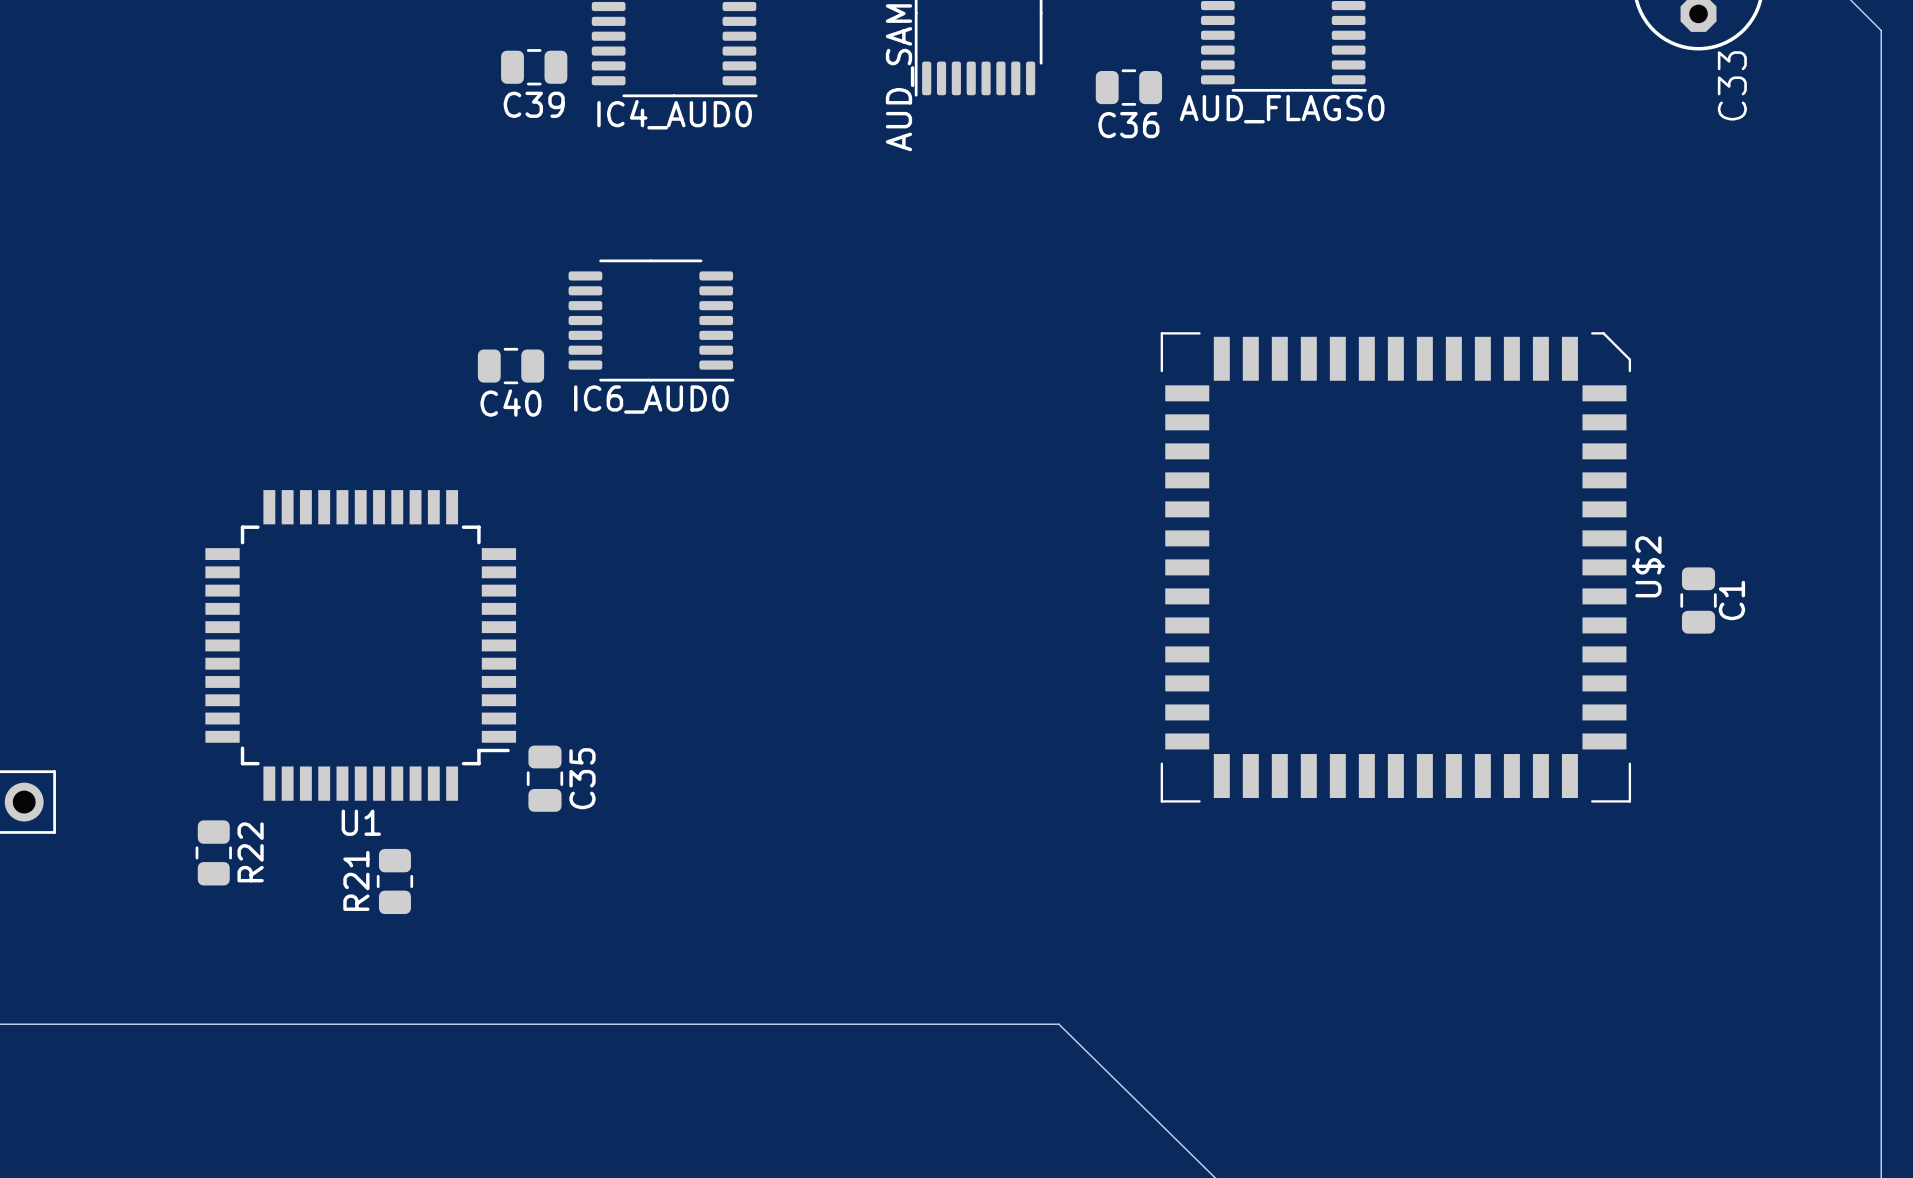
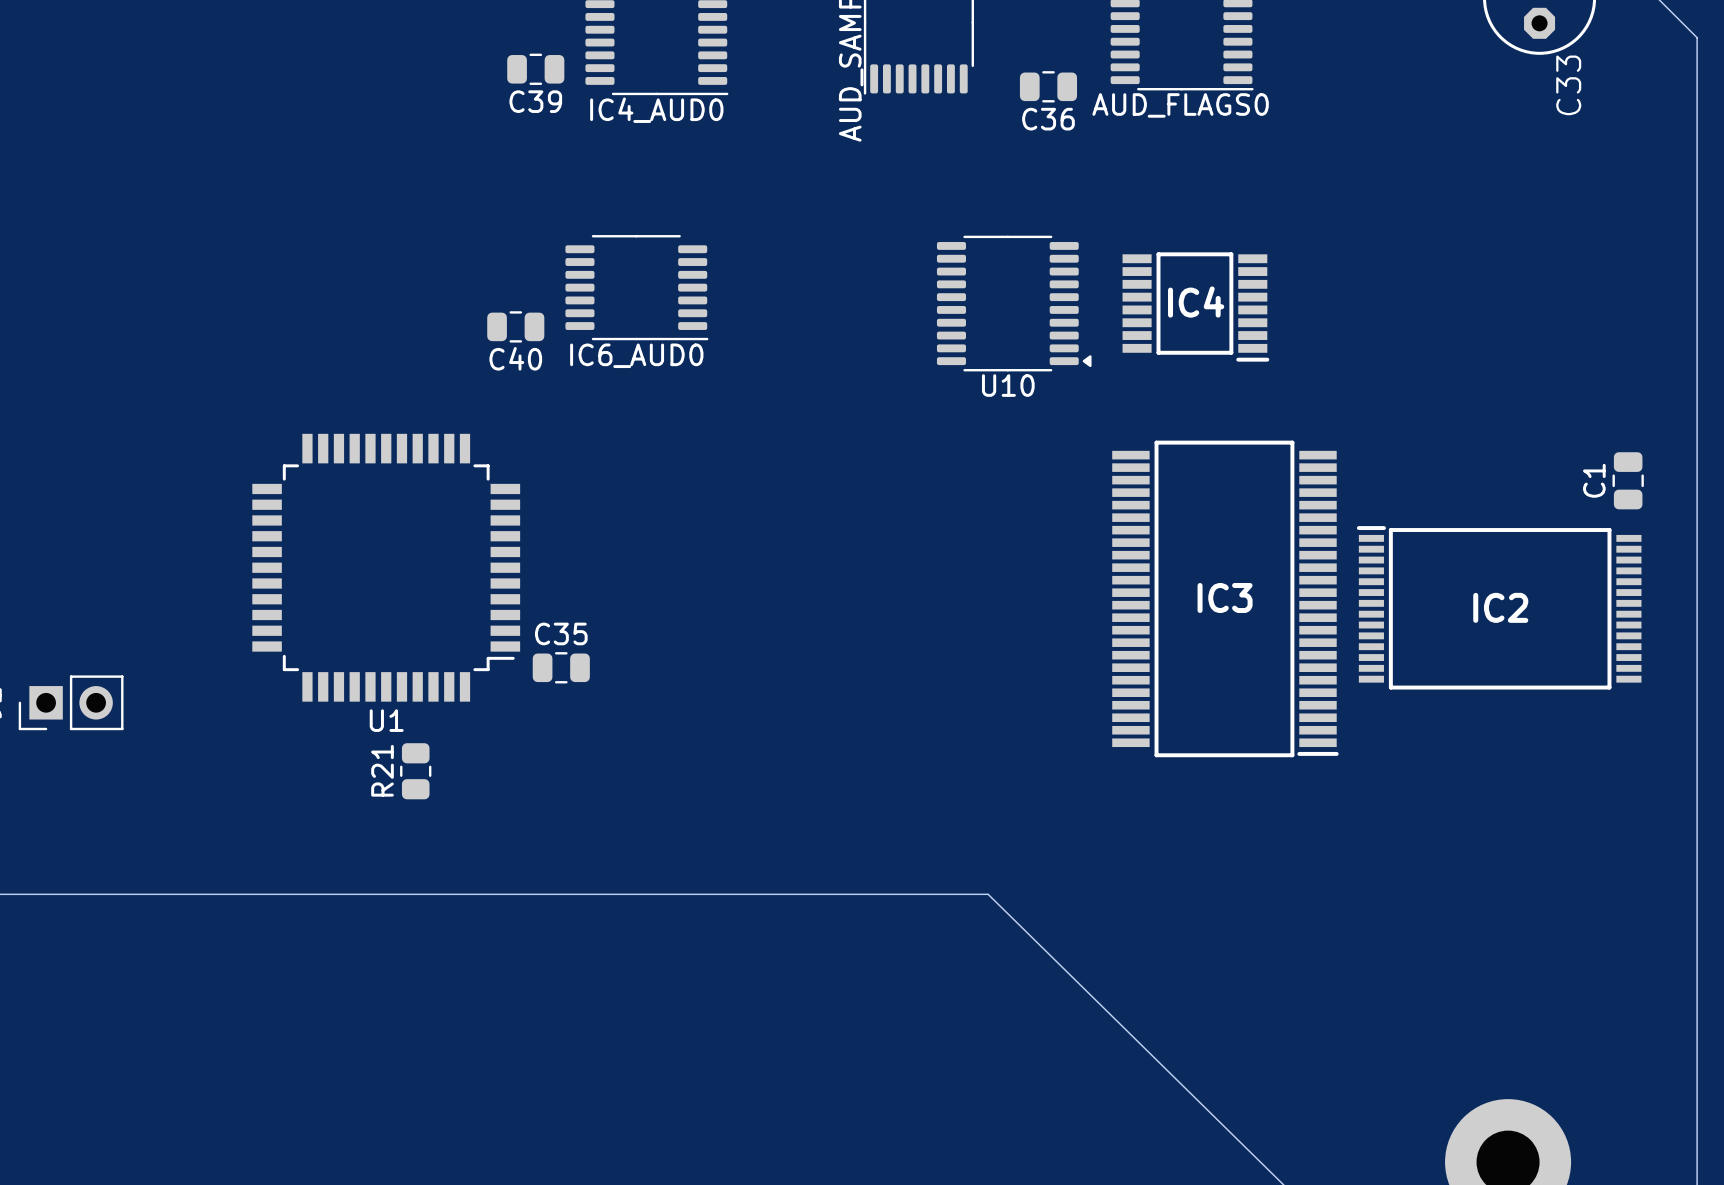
U10: none -> (1014, 303)
IC4: none -> (1195, 306)
U$2: (1395, 567) -> none
C1 position: (1698, 600) -> (1628, 480)
C1 name position: C1 (1731, 600) -> C1 (1594, 480)
IC3: none -> (1225, 598)
IC2: none -> (1499, 607)
C35 rotation: 0° (544, 778) -> 90° clockwise (561, 667)
C35 name position: C35 (582, 778) -> C35 (561, 633)
R22: (213, 852) -> none

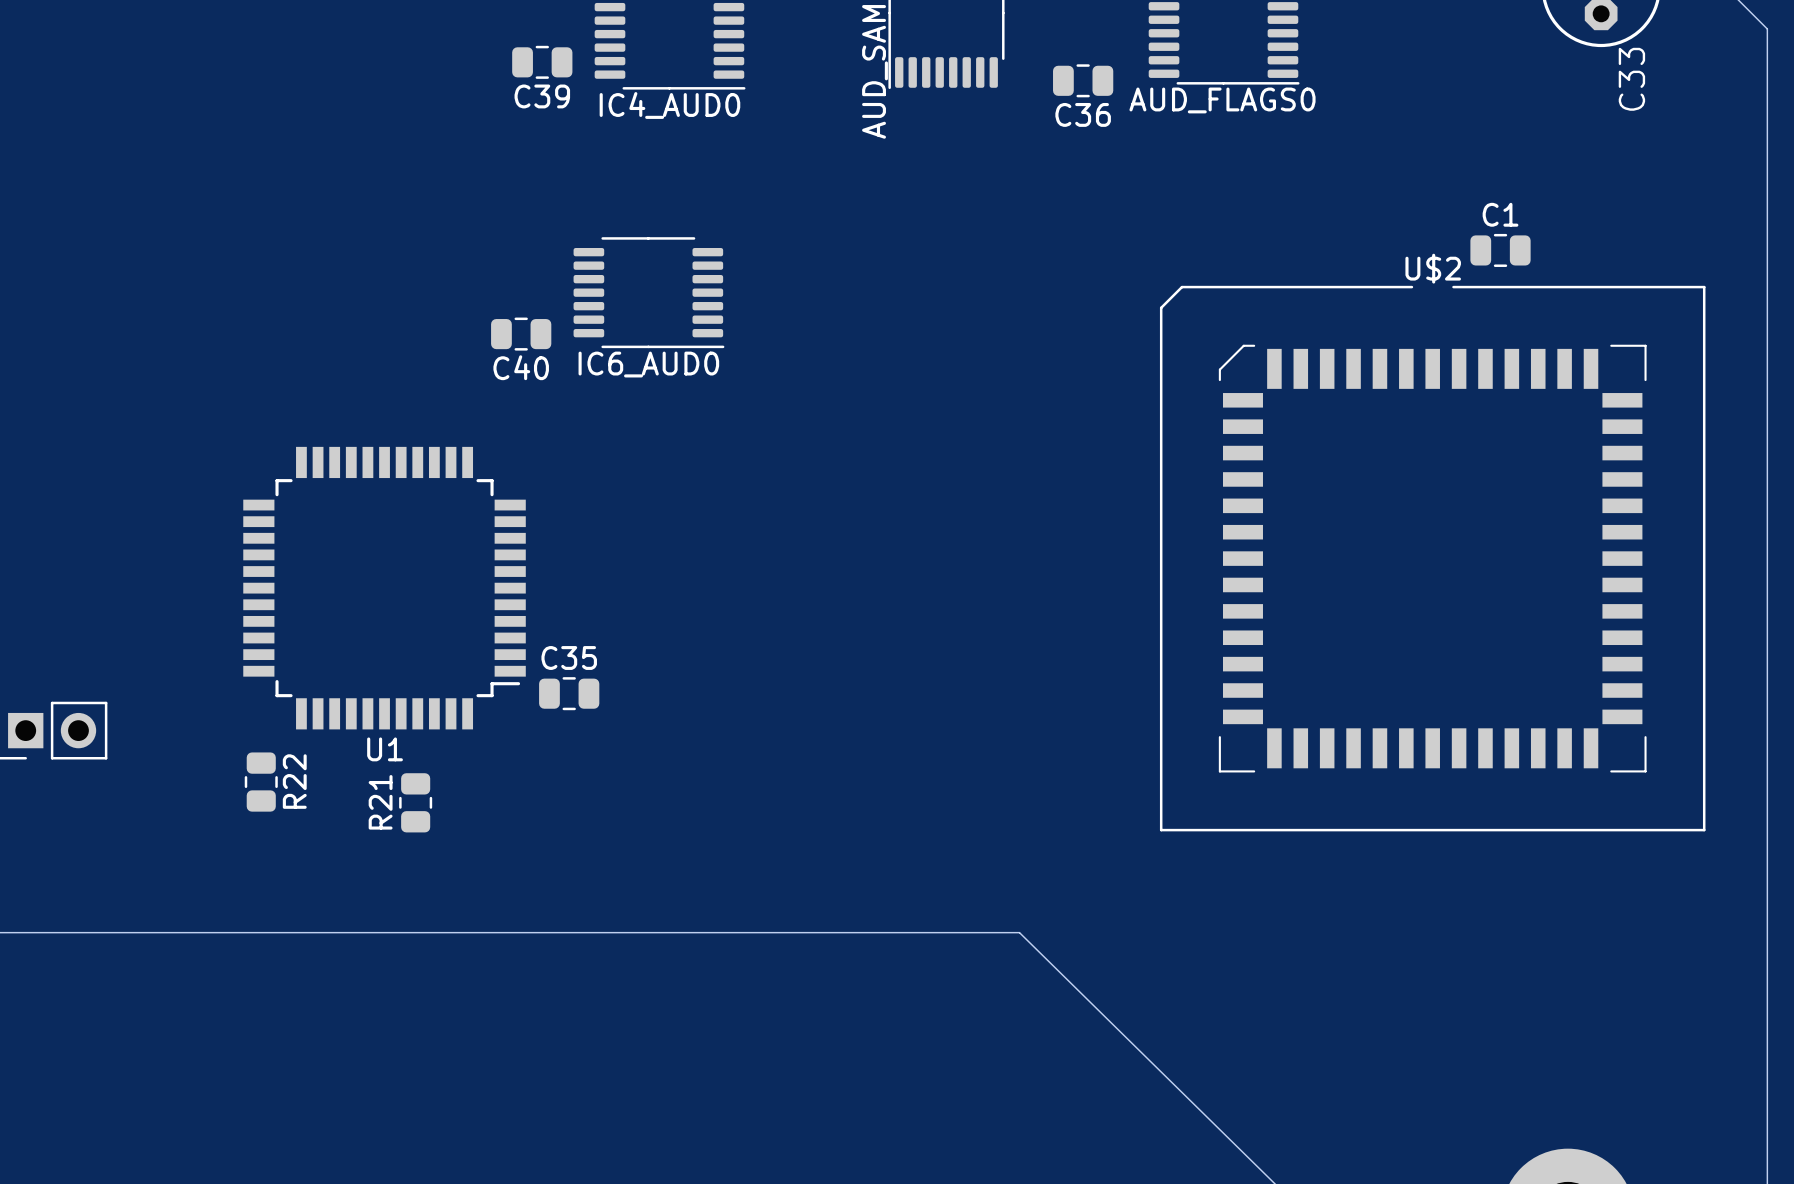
U10: (1014, 303) -> none
IC4: (1195, 306) -> none
C1 rotation: 0° (1628, 480) -> 90° clockwise (1500, 250)
C1 position: (1628, 480) -> (1500, 250)
U$2: none -> (1432, 558)
IC3: (1225, 598) -> none
IC2: (1499, 607) -> none
R22: none -> (261, 782)

